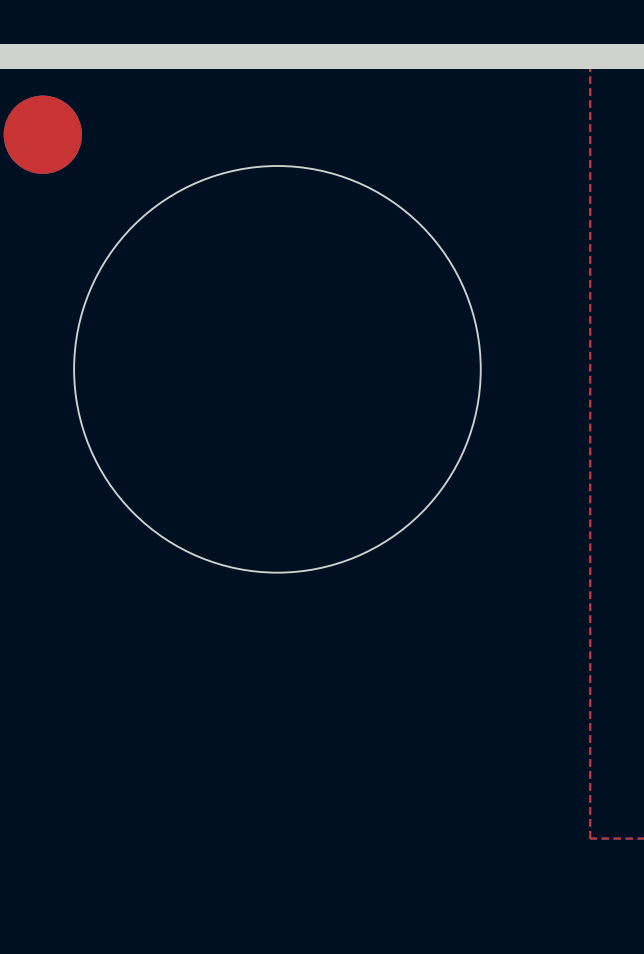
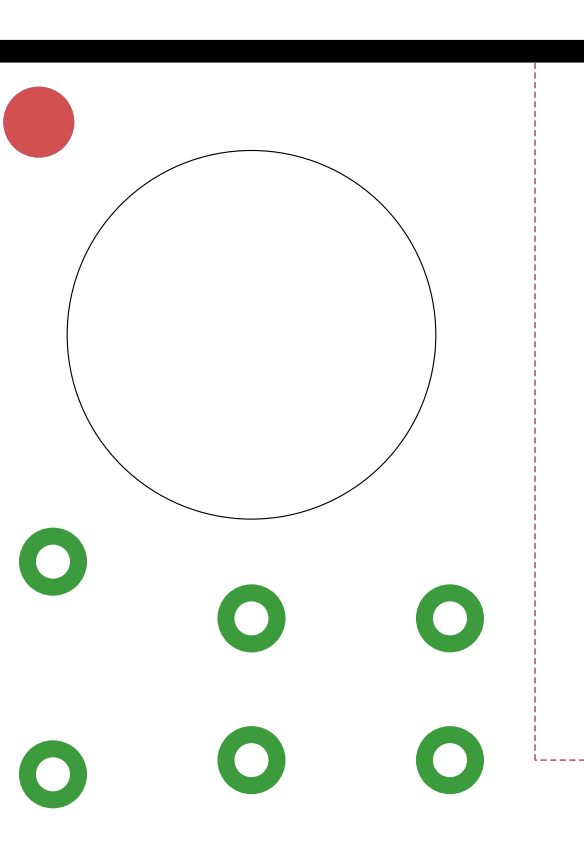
via: none -> (52, 561)
via: none -> (251, 618)
via: none -> (449, 618)
via: none -> (251, 760)
via: none -> (449, 760)
via: none -> (52, 774)

